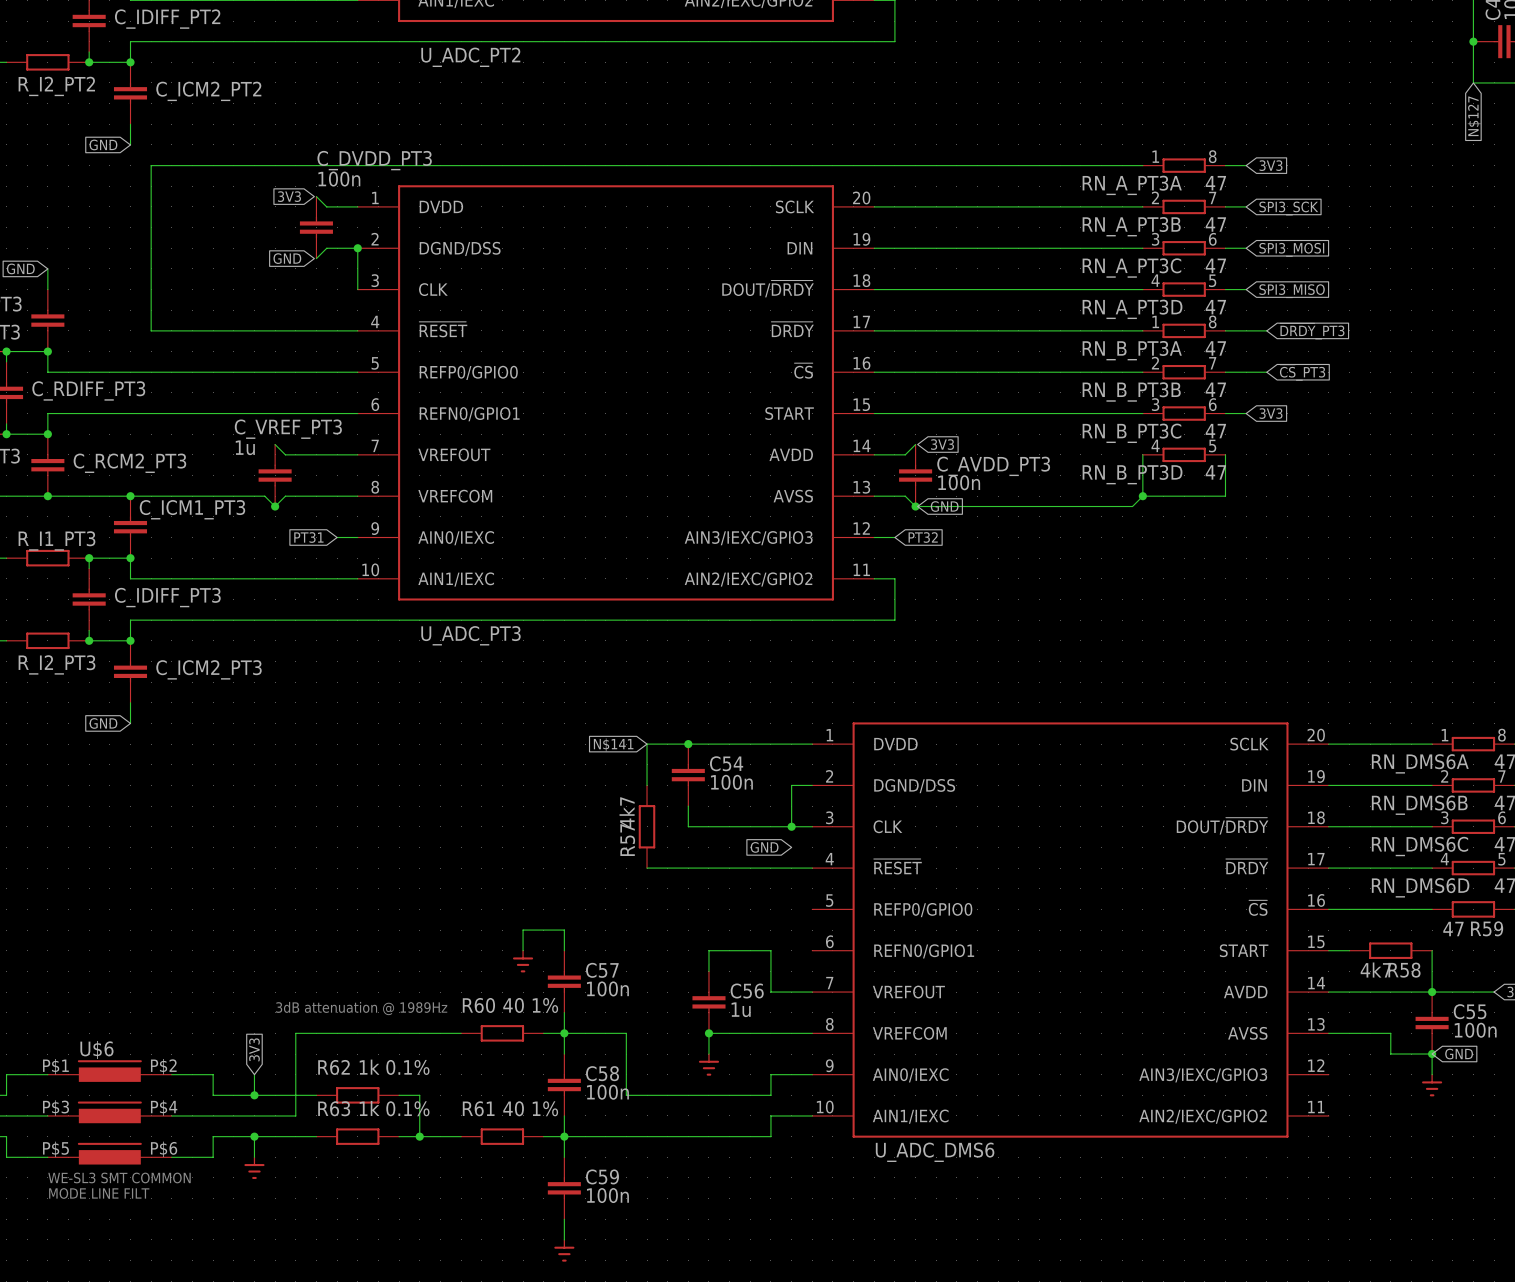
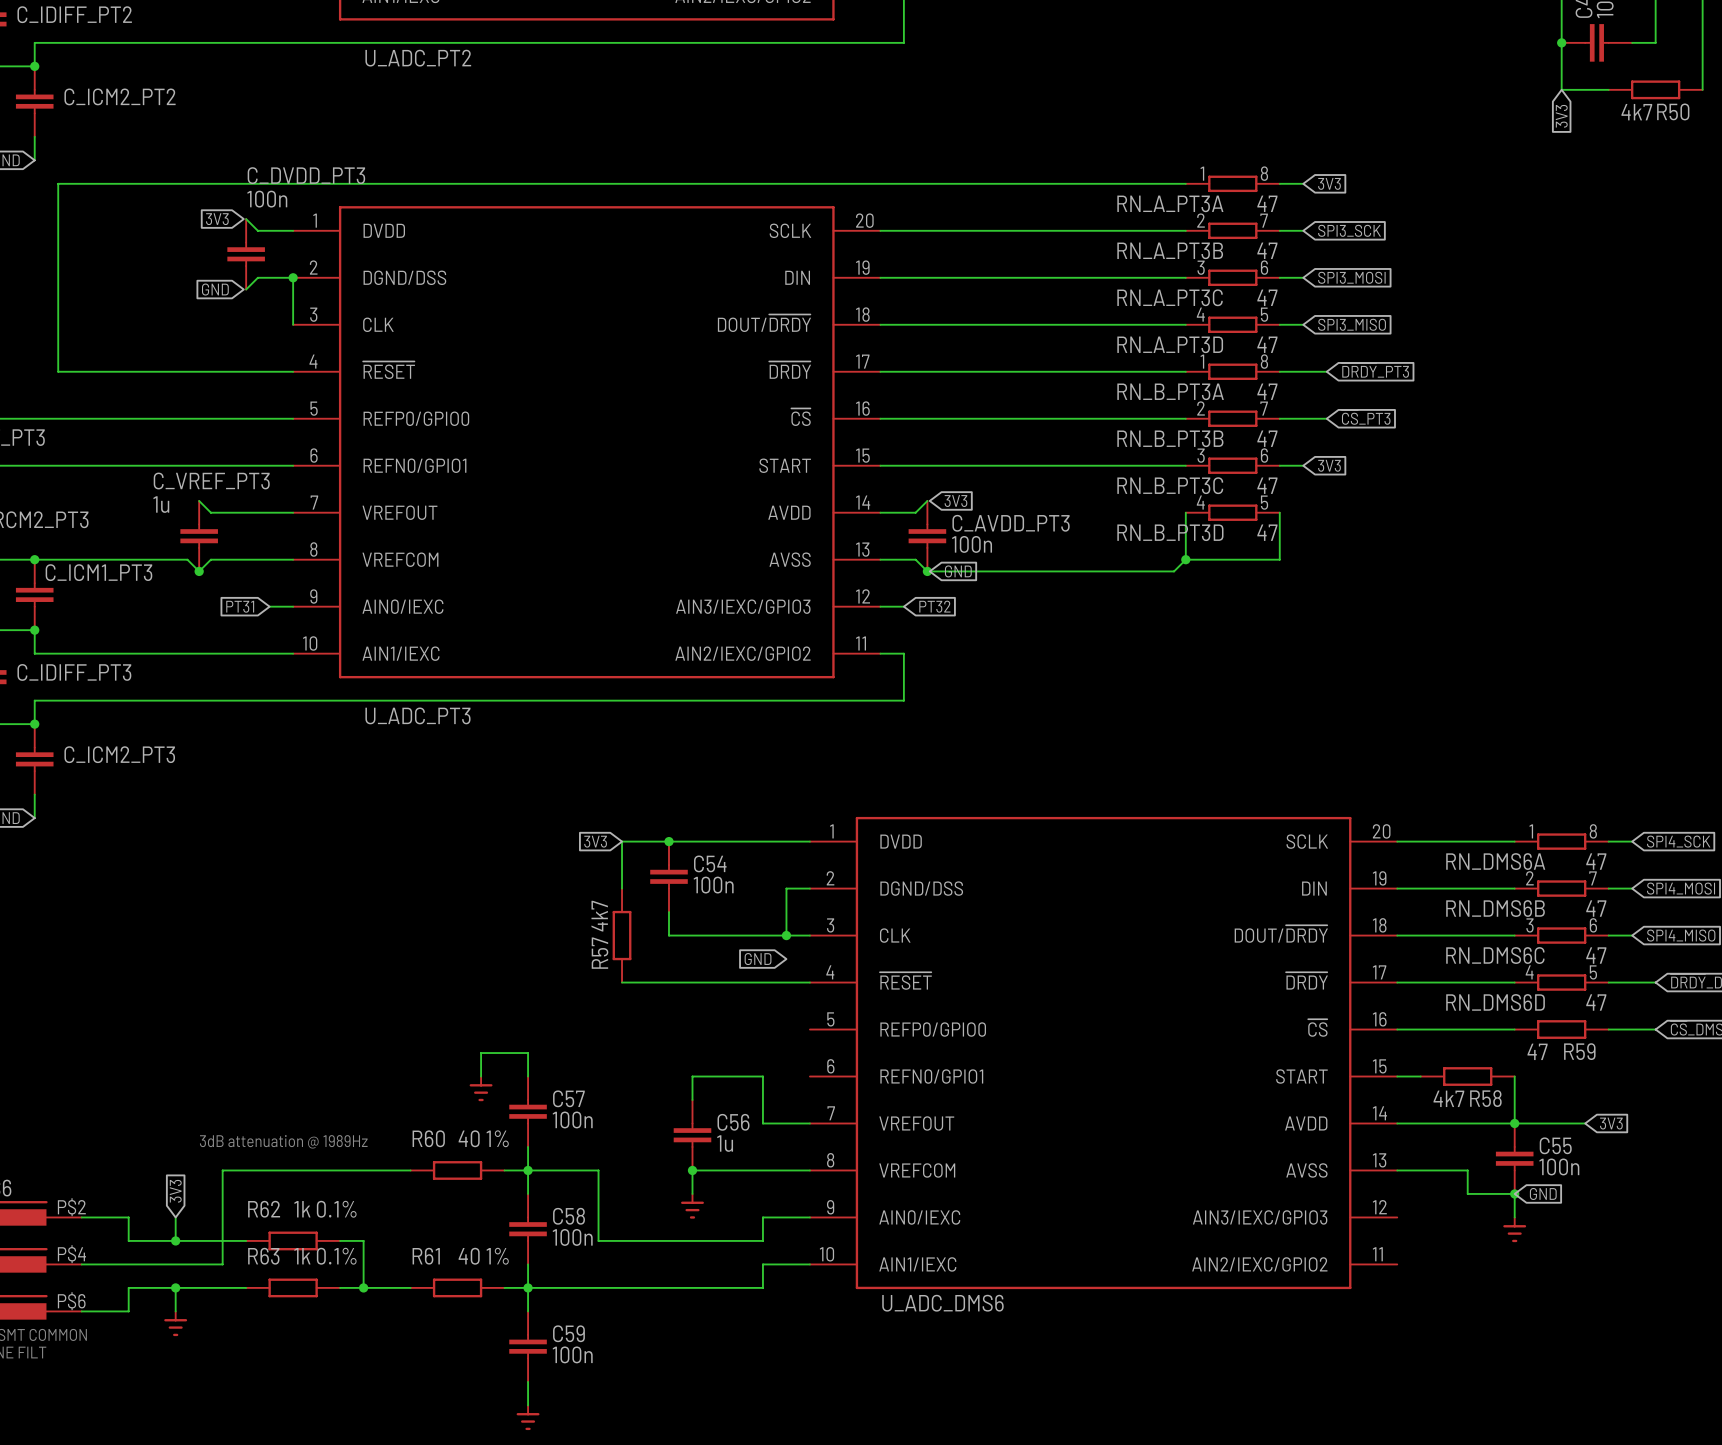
global label: N$127 (1474, 116) -> 3V3 (1561, 116)
global label: N$141 (613, 744) -> 3V3 (595, 841)

